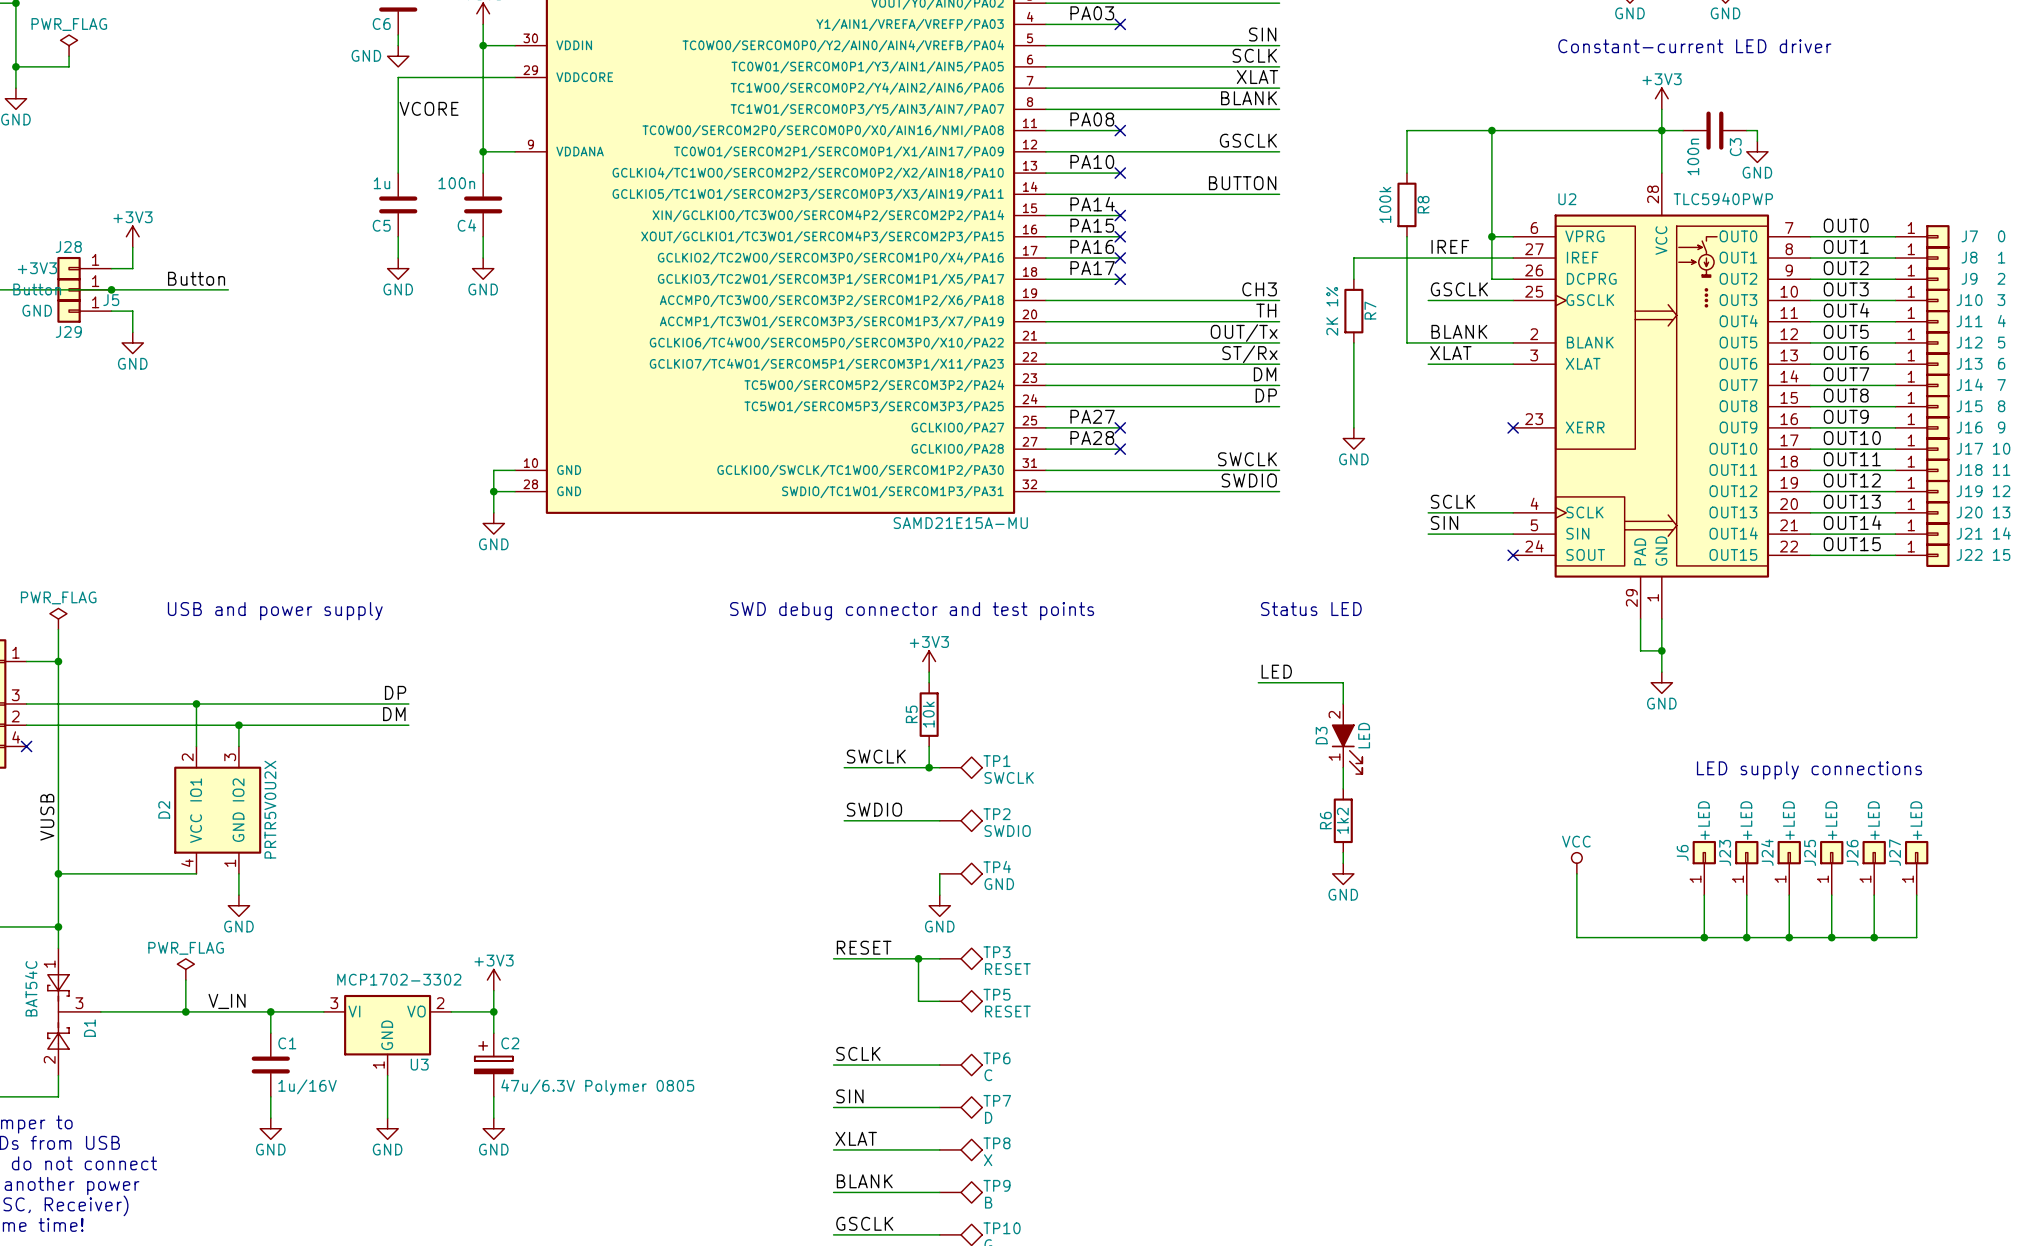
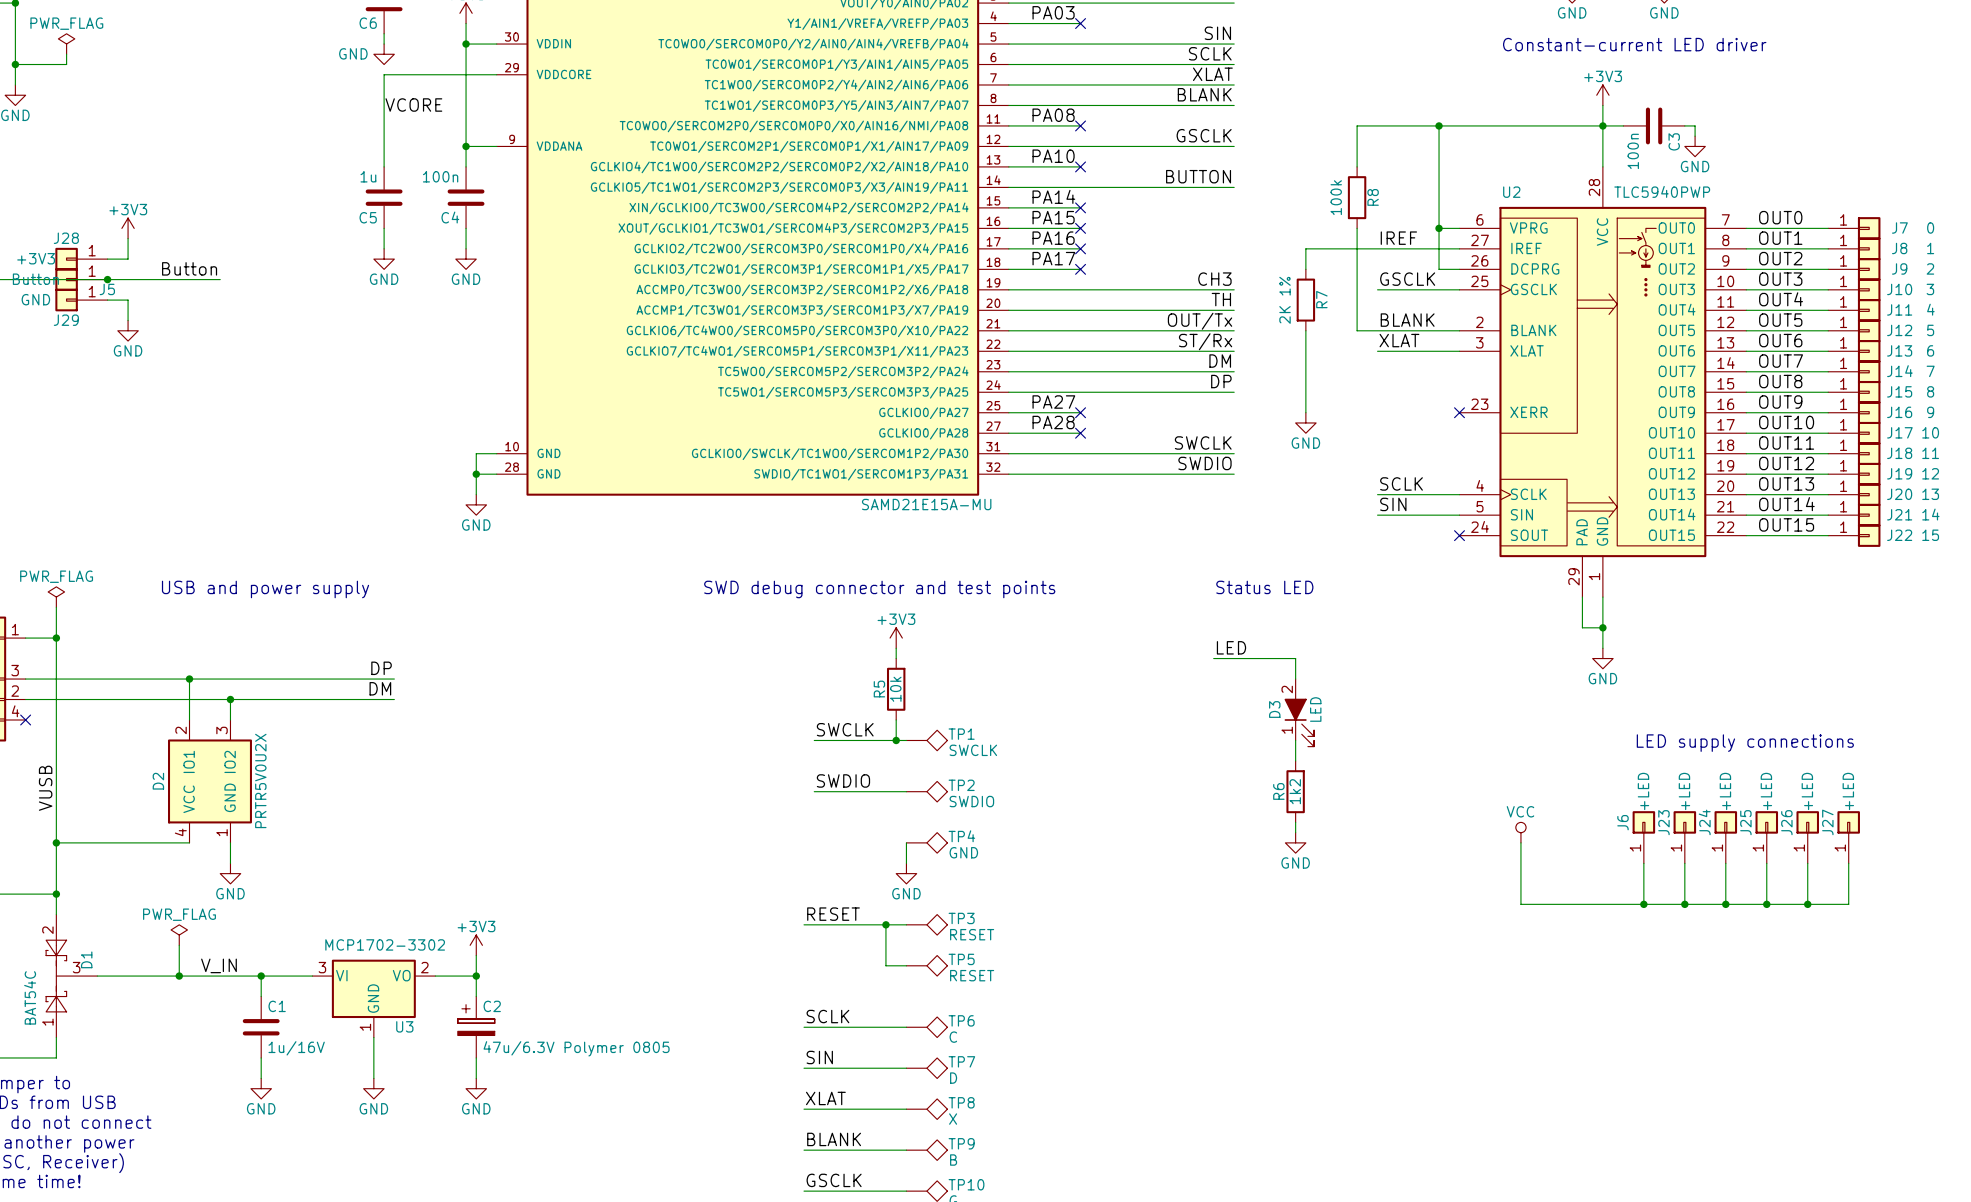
D1 flip: as is (58, 1011) -> up-down (56, 976)

